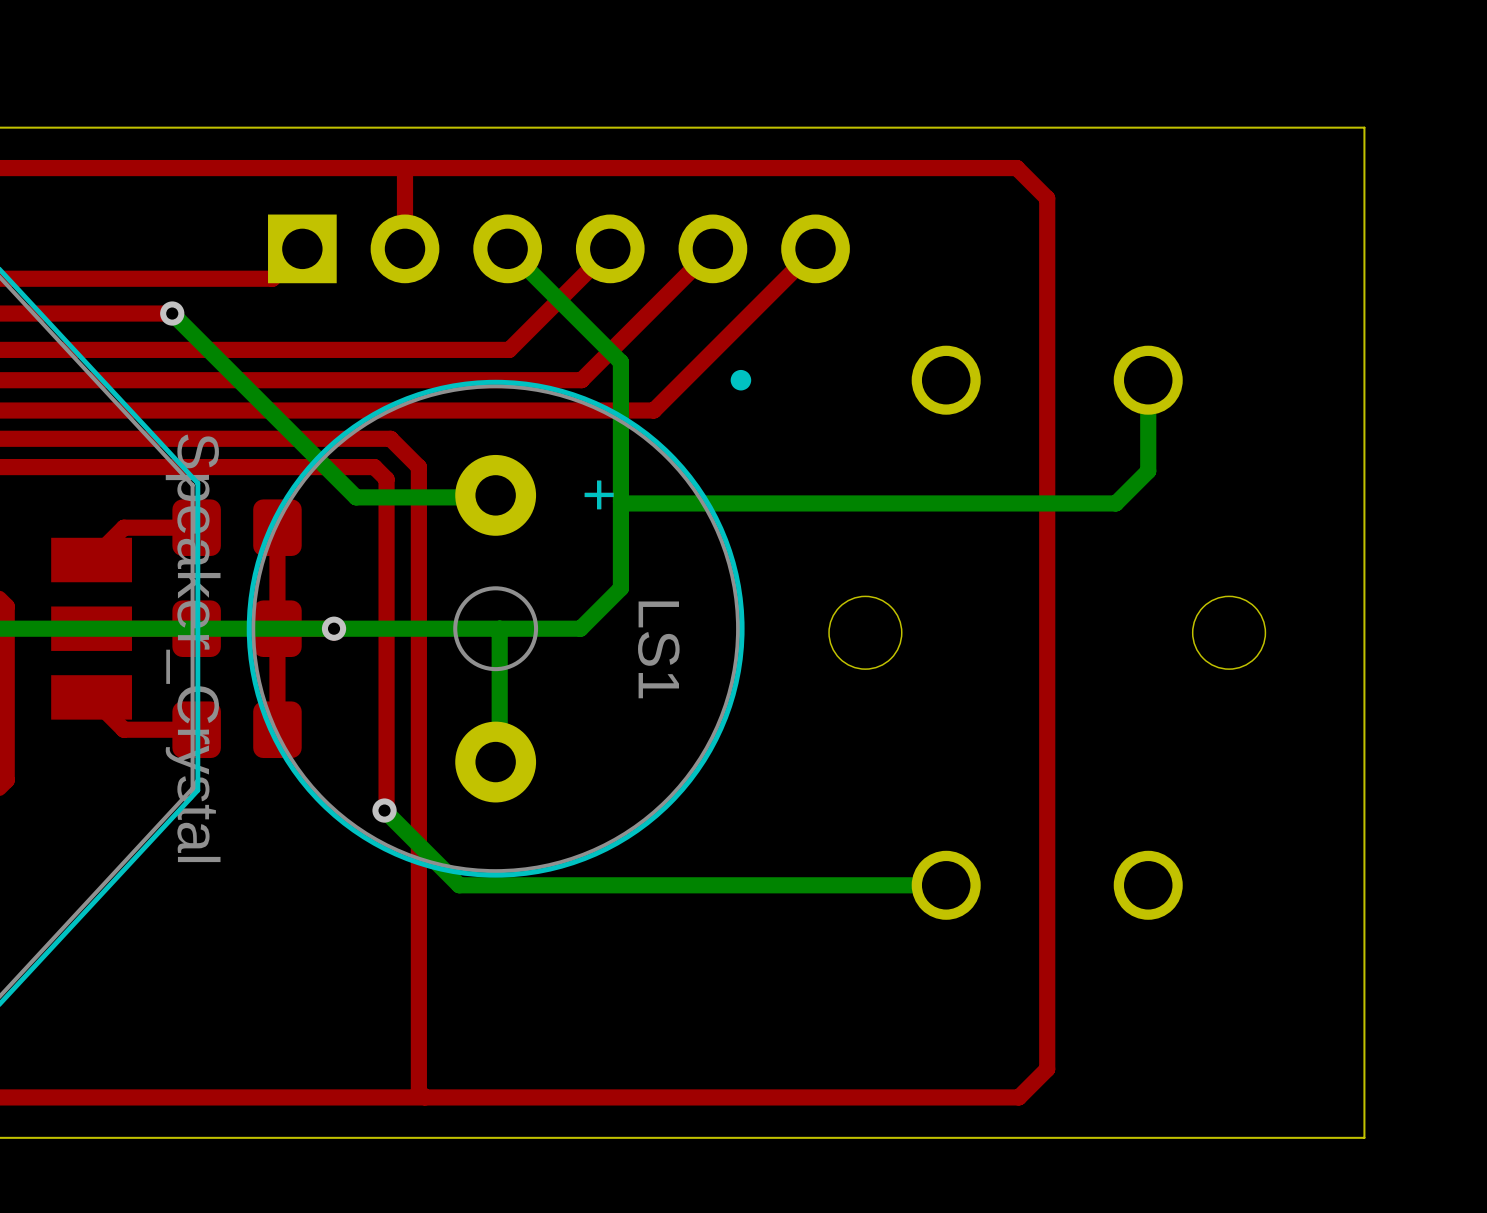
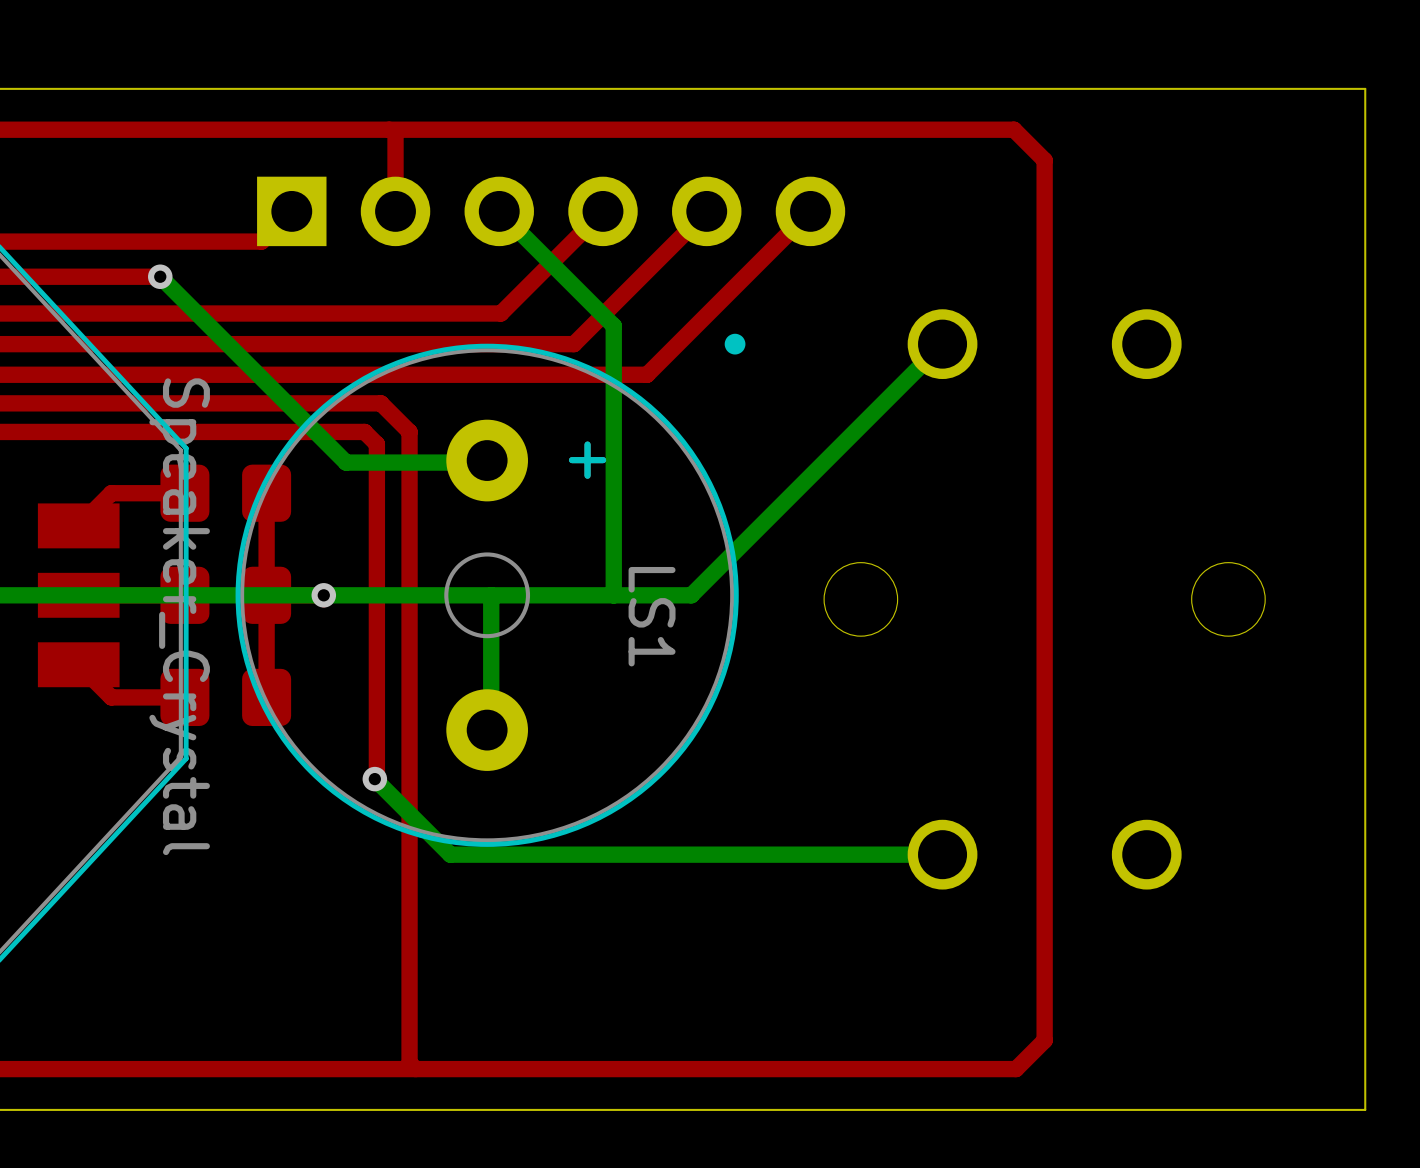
bottom track: none -> (942, 344) (691, 595) (572, 595)
bottom track: (1148, 380) (1148, 471) (1115, 503) (622, 503) (620, 501) -> none
bottom track: (620, 588) (580, 628) -> (613, 554) (613, 595)

